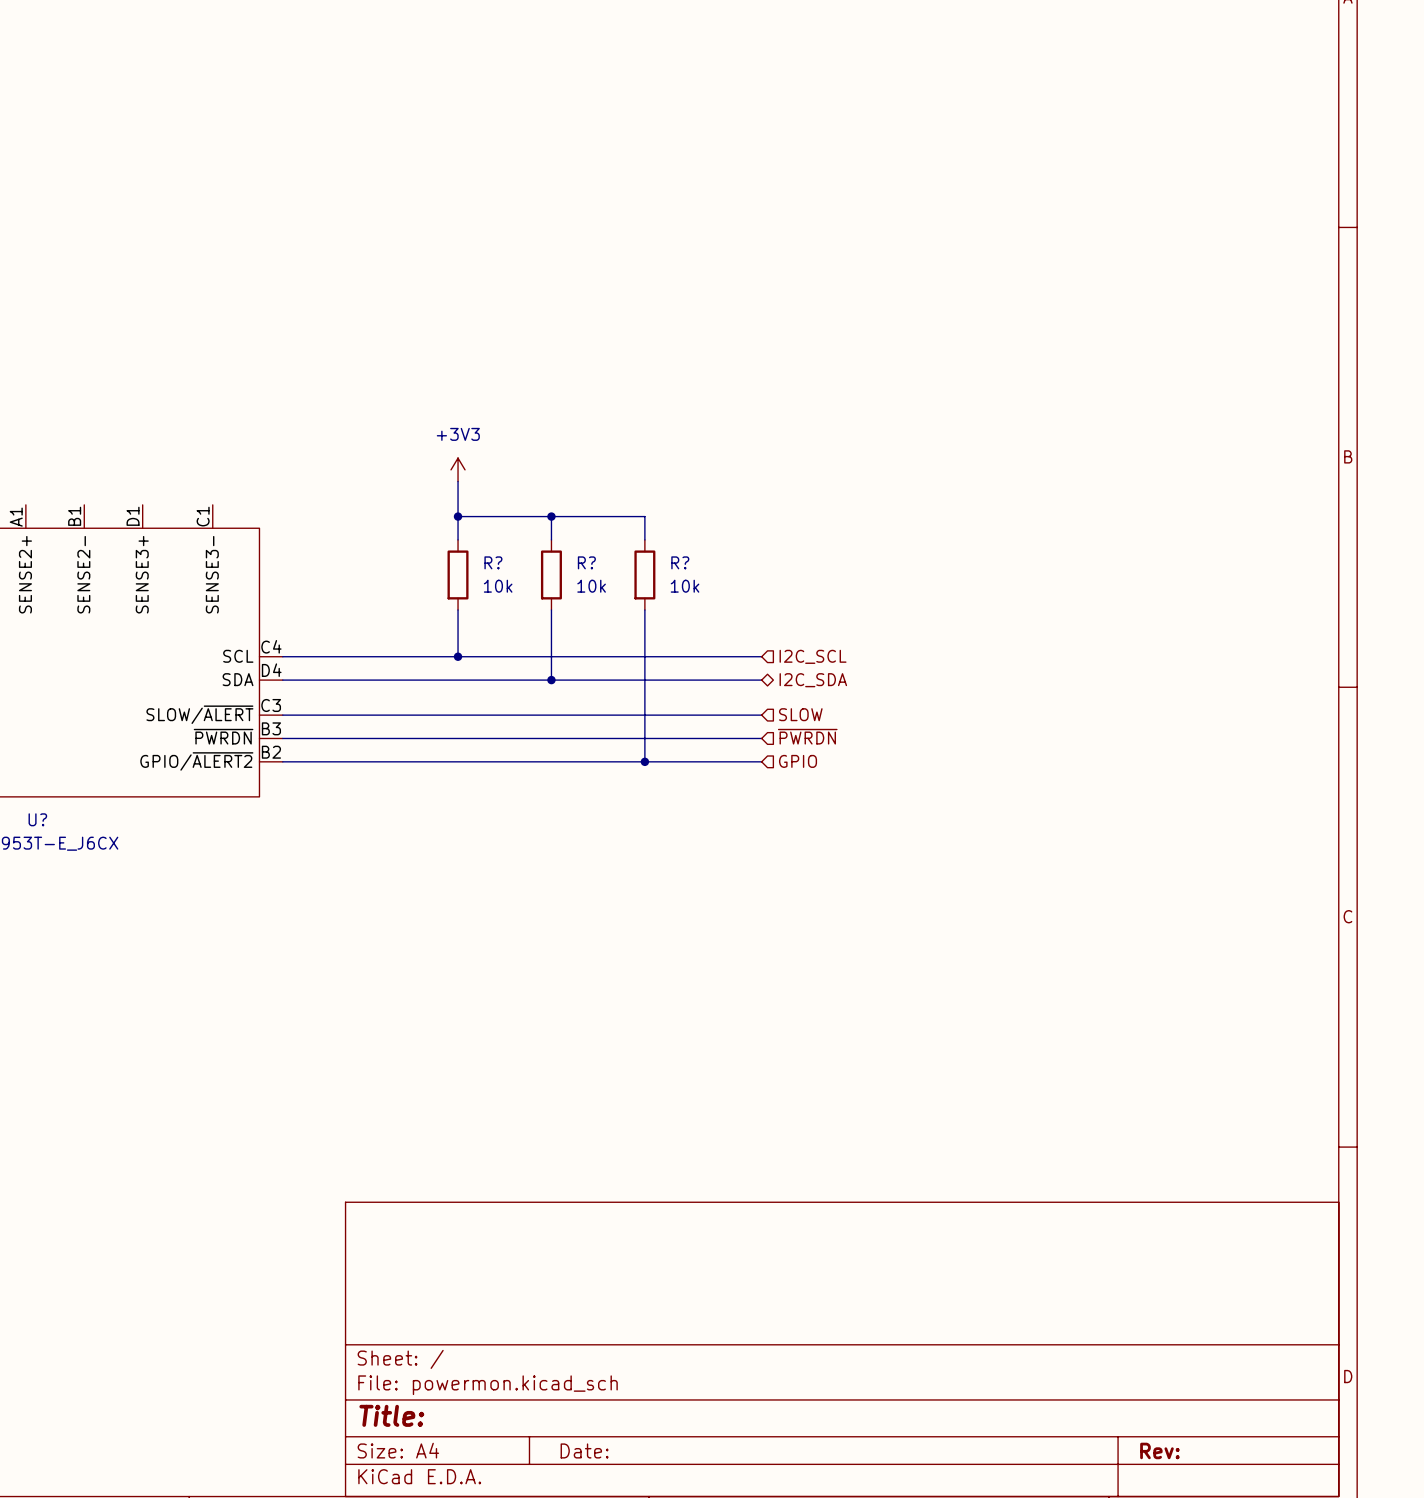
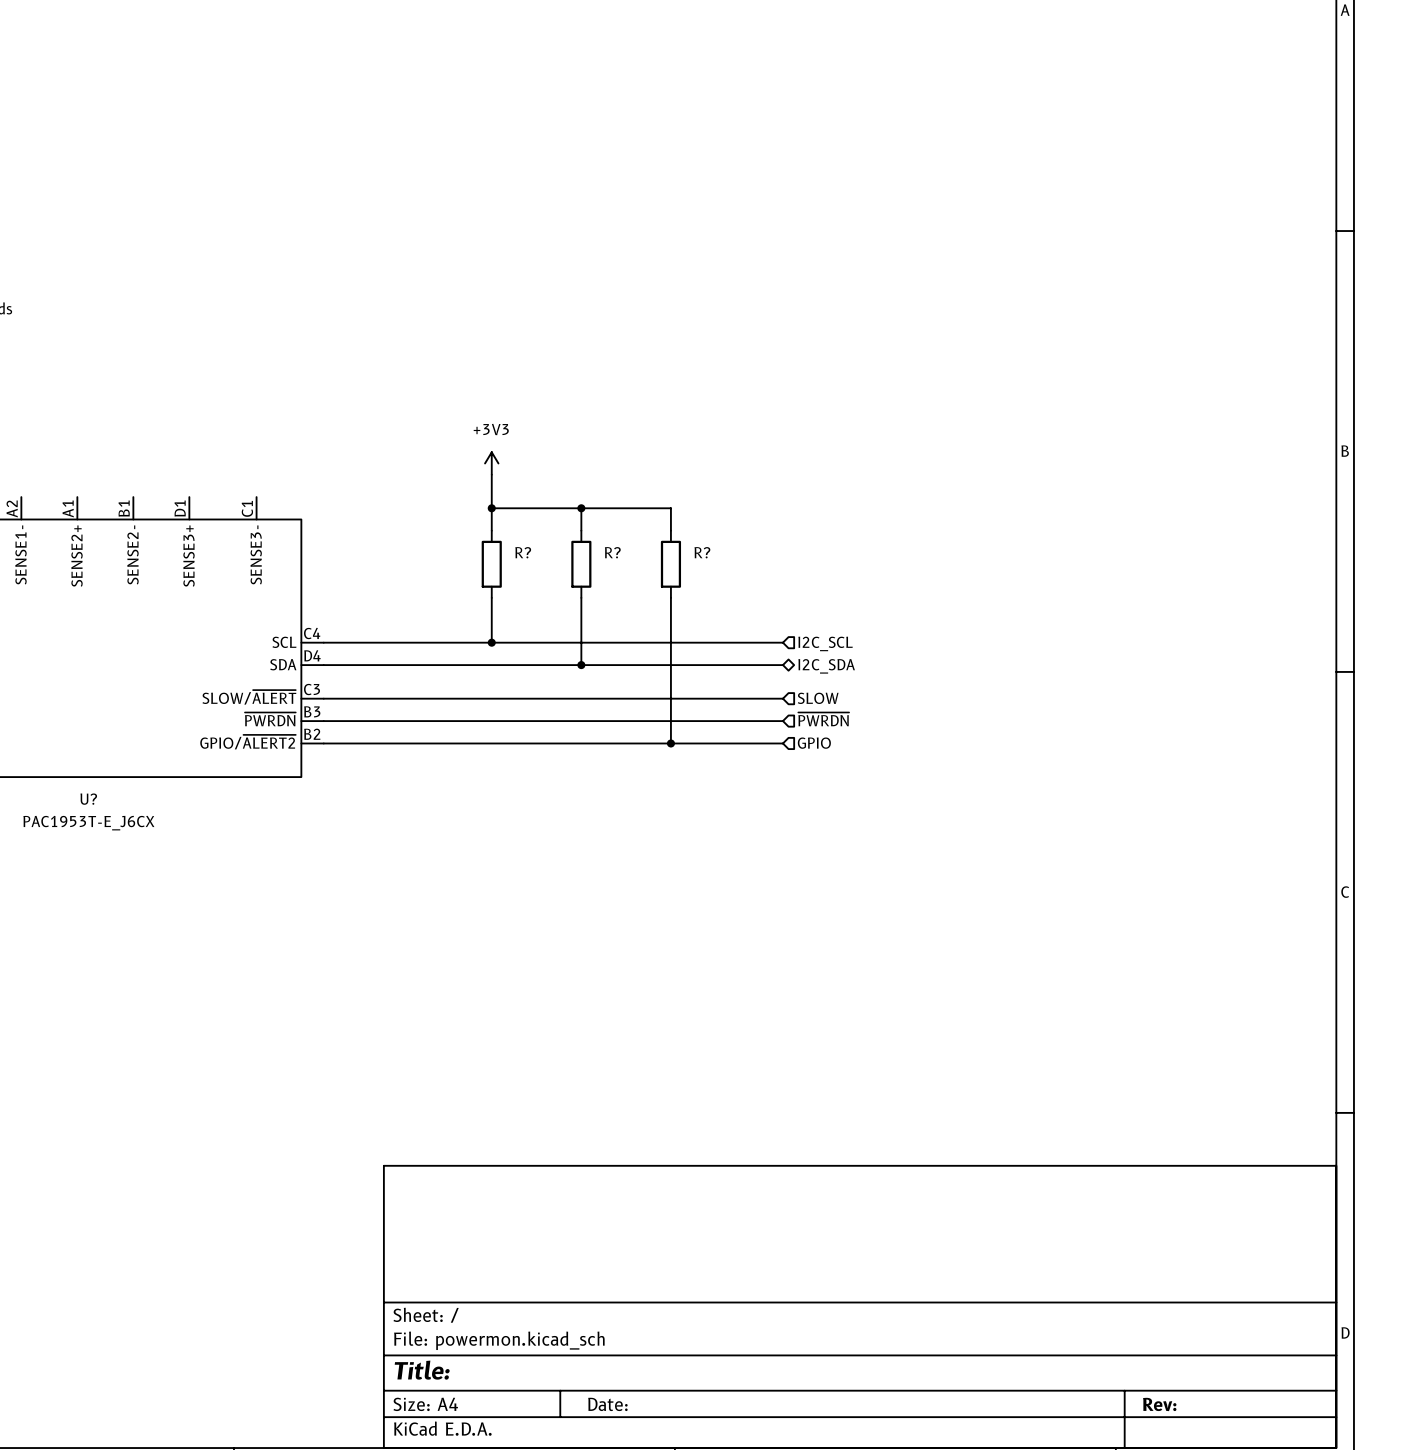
R? value: 10k (498, 586) -> none
R? value: 10k (591, 586) -> none
R? value: 10k (685, 586) -> none

